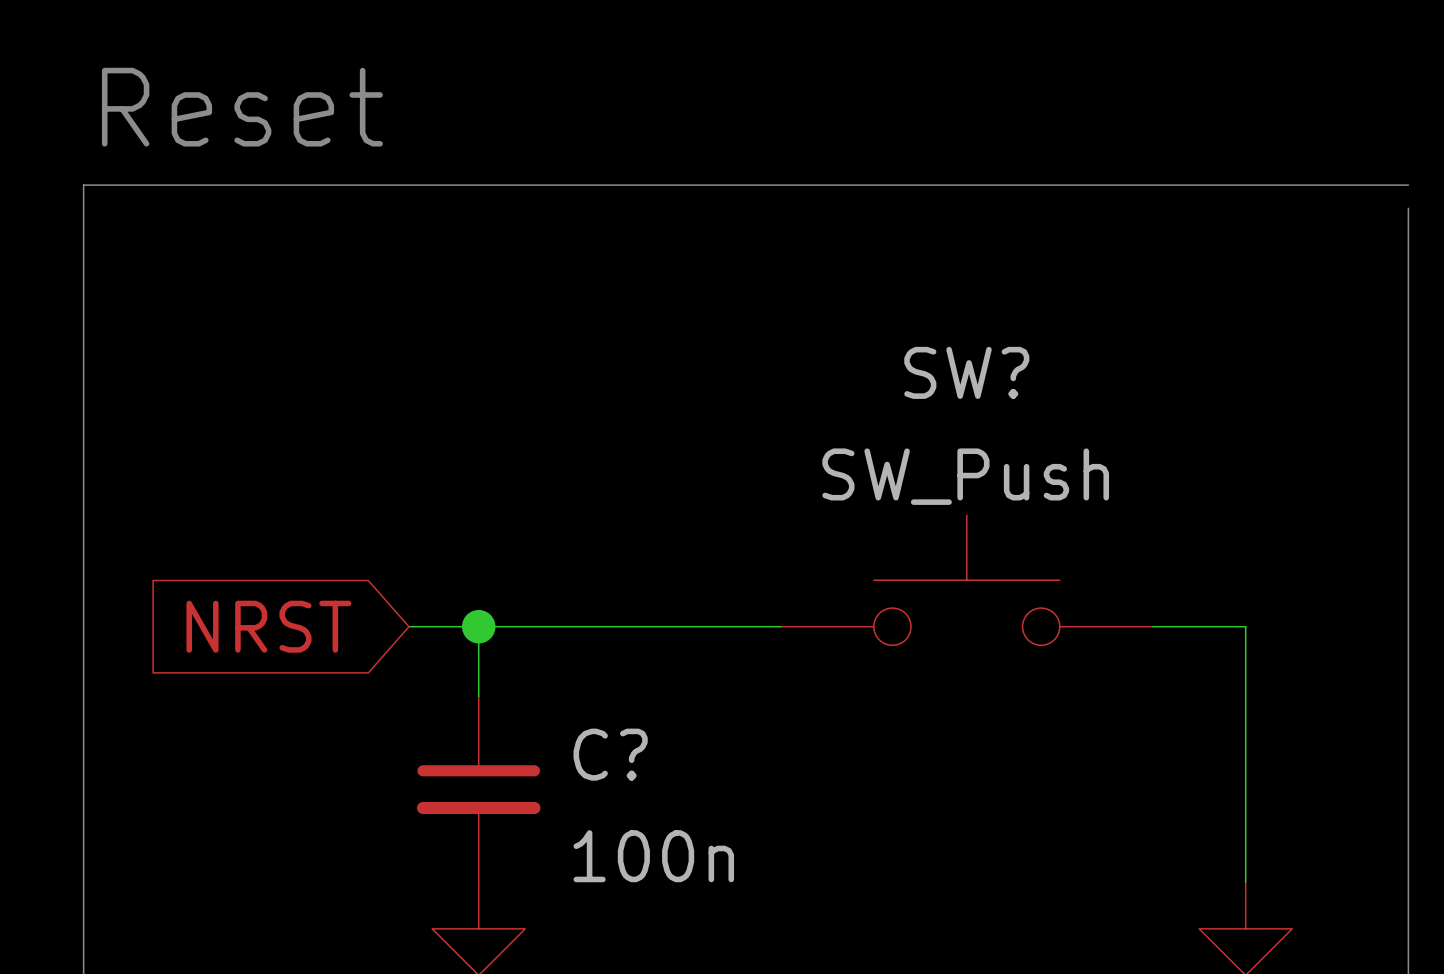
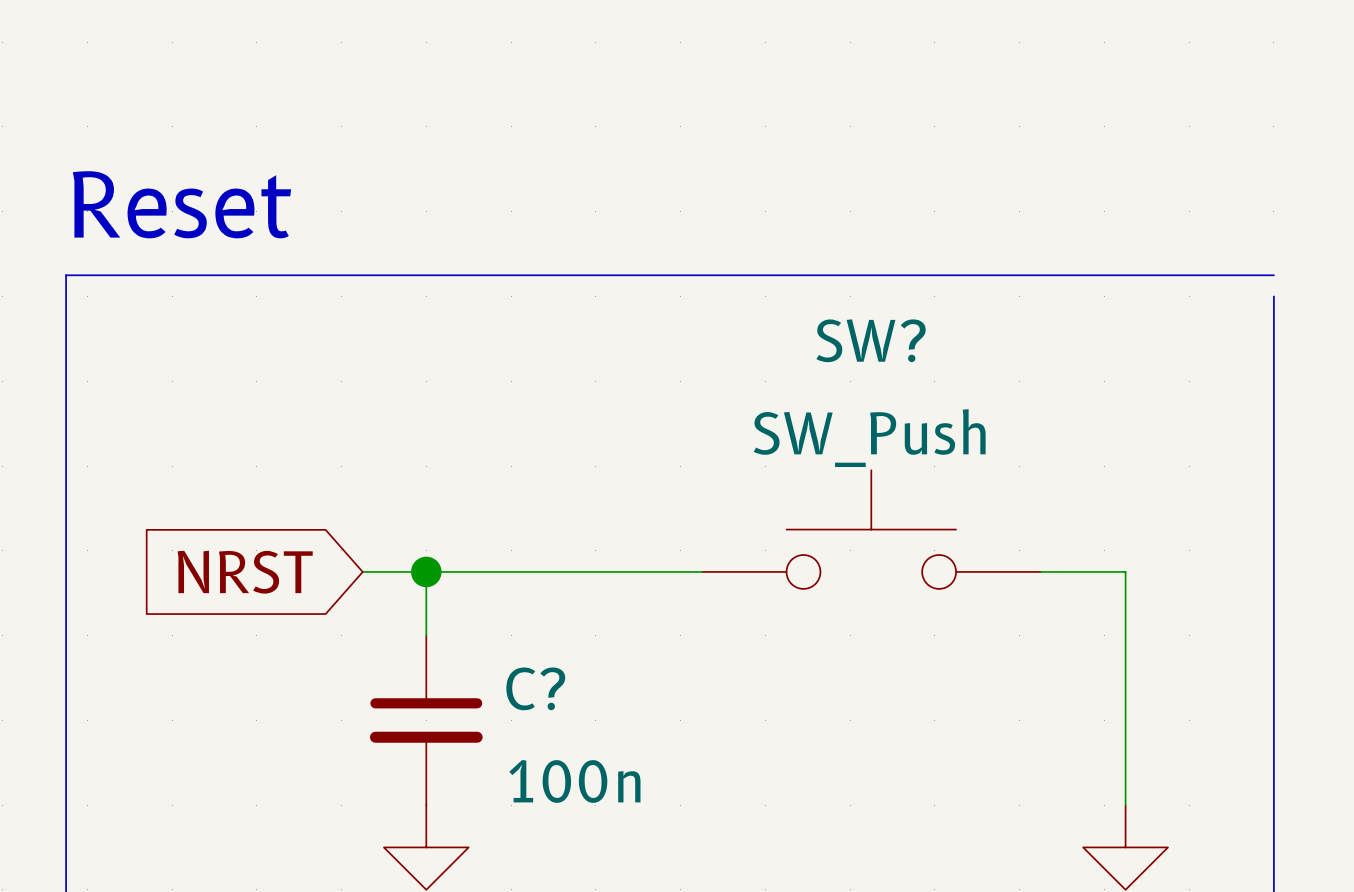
text position: Reset (242, 107) -> Reset (181, 204)
line: (1408, 185) (83, 185) (83, 301) -> (1273, 275) (66, 275)
line: (1408, 208) (1408, 324) -> none

